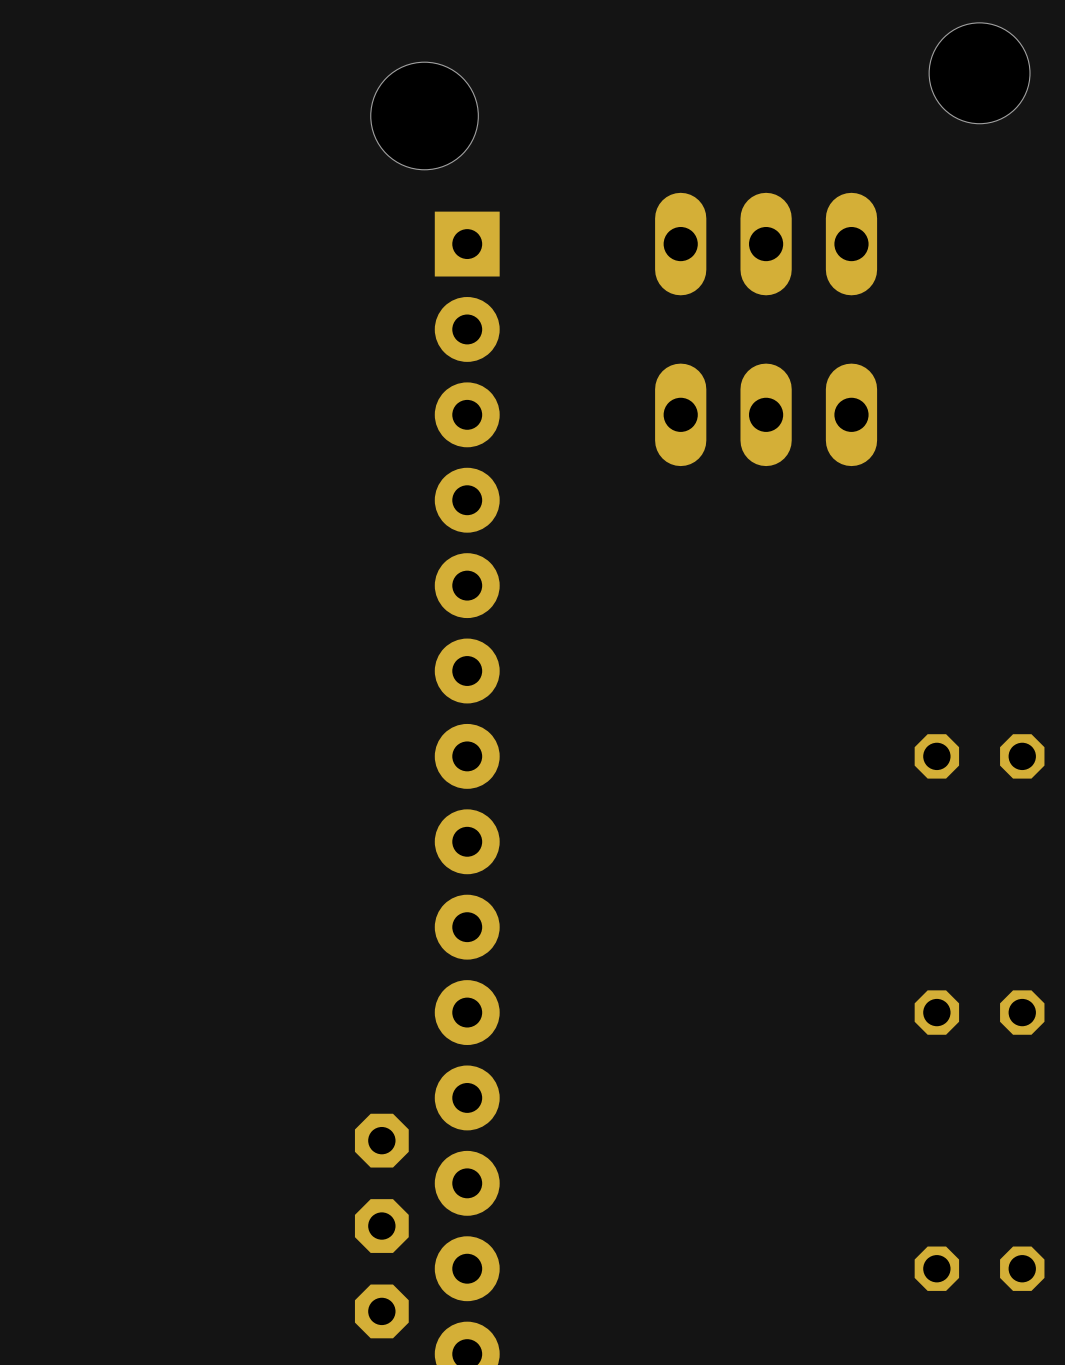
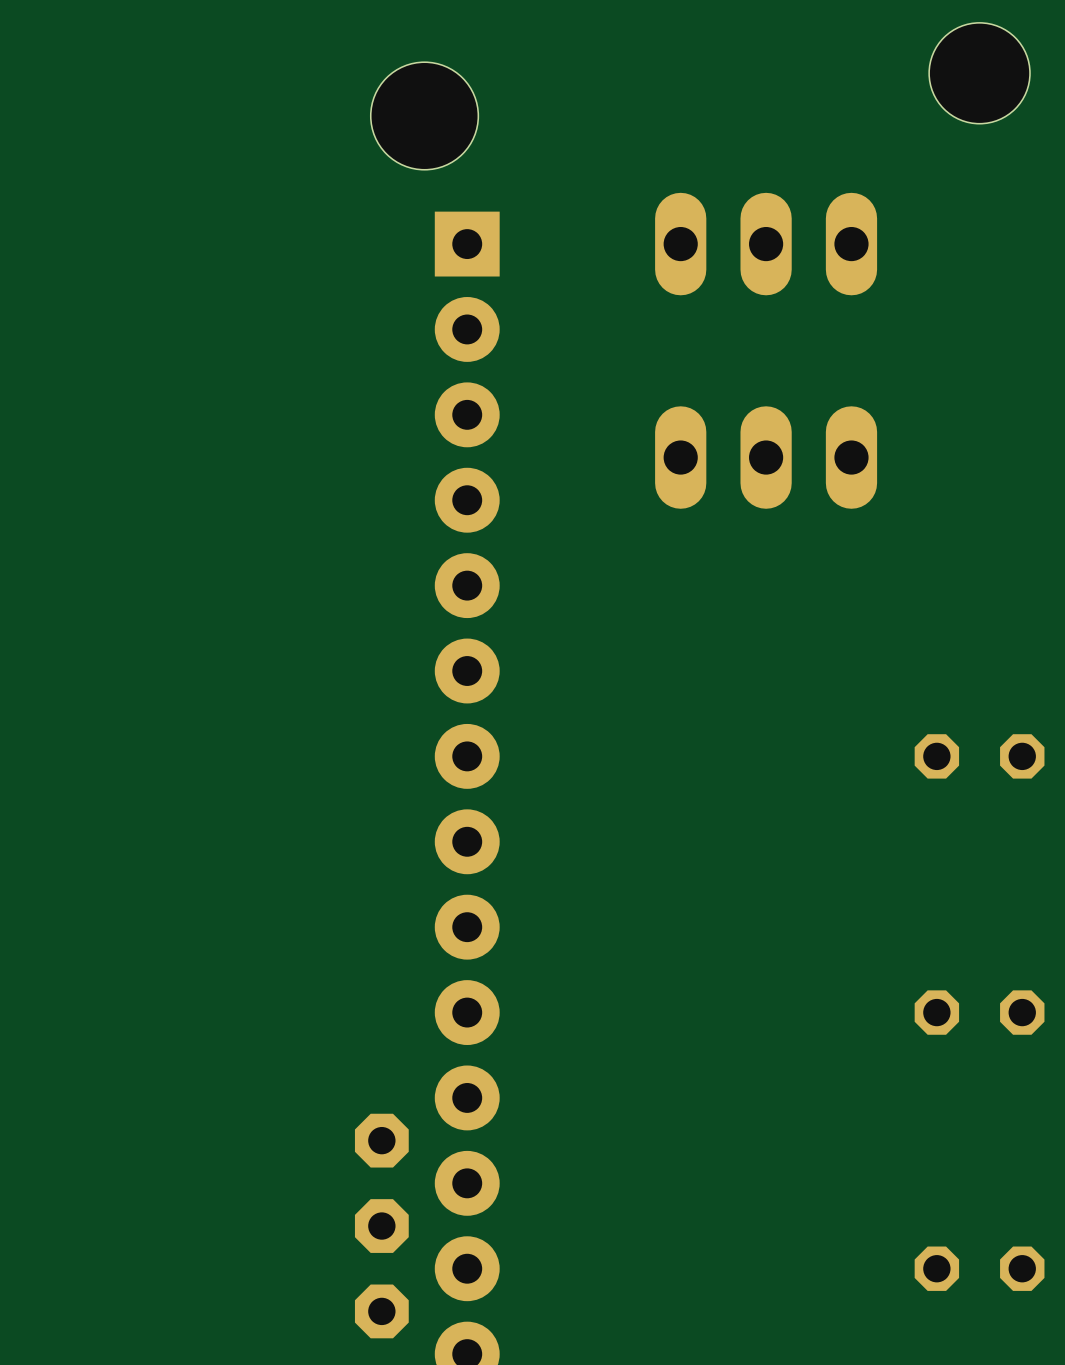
part position: (766, 414) -> (766, 457)

